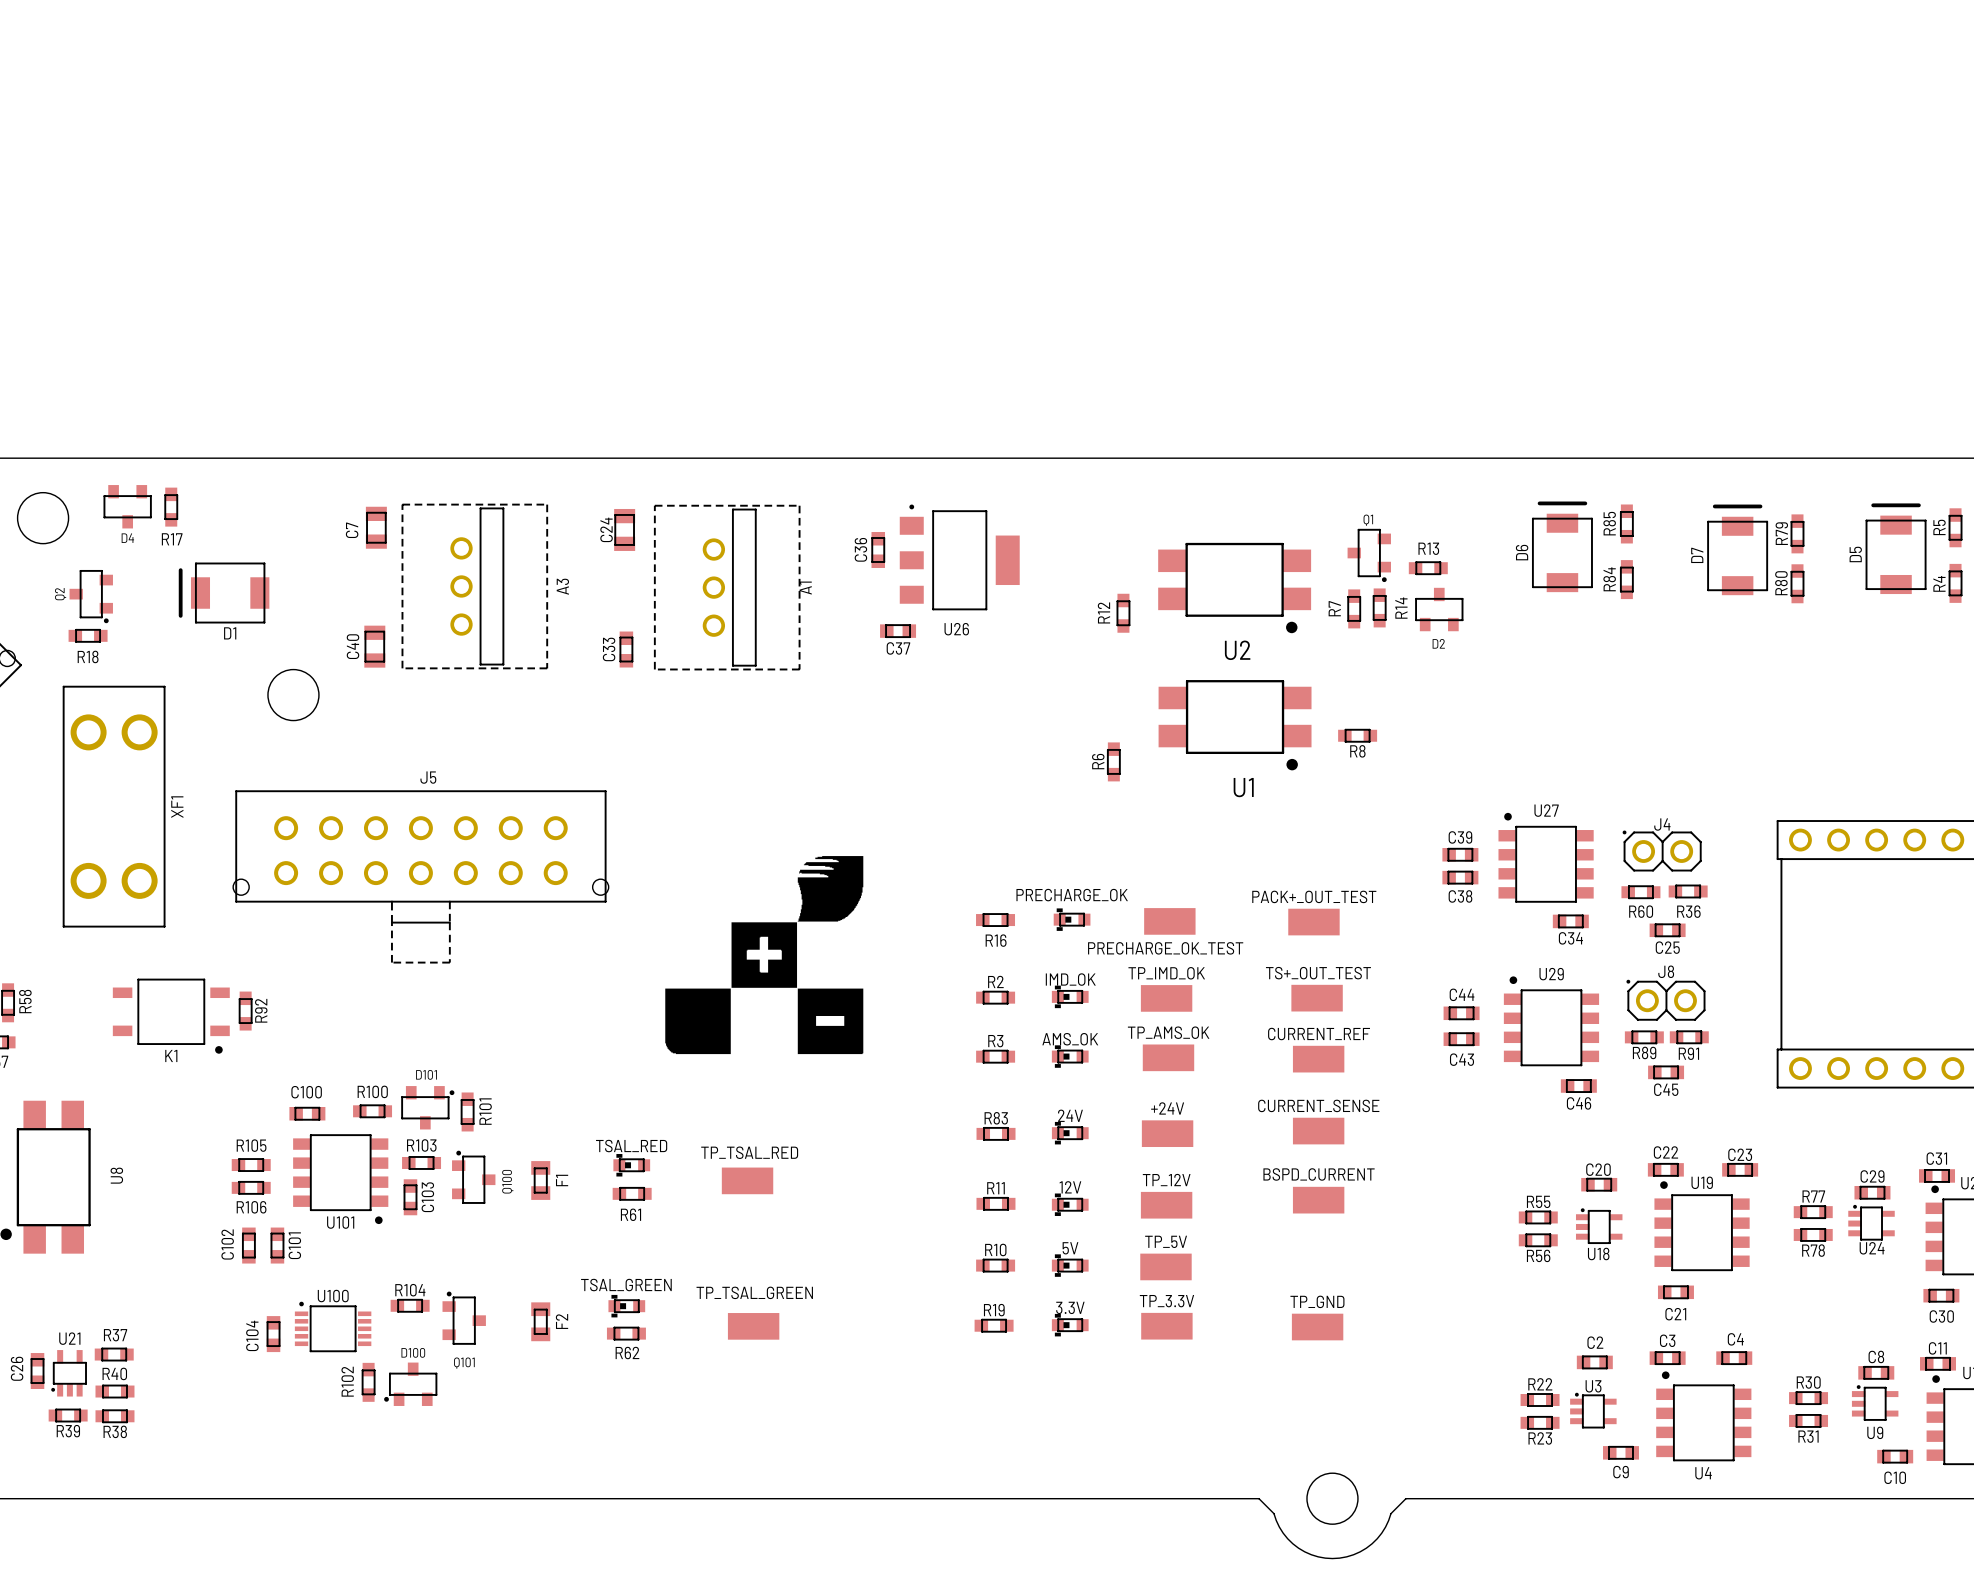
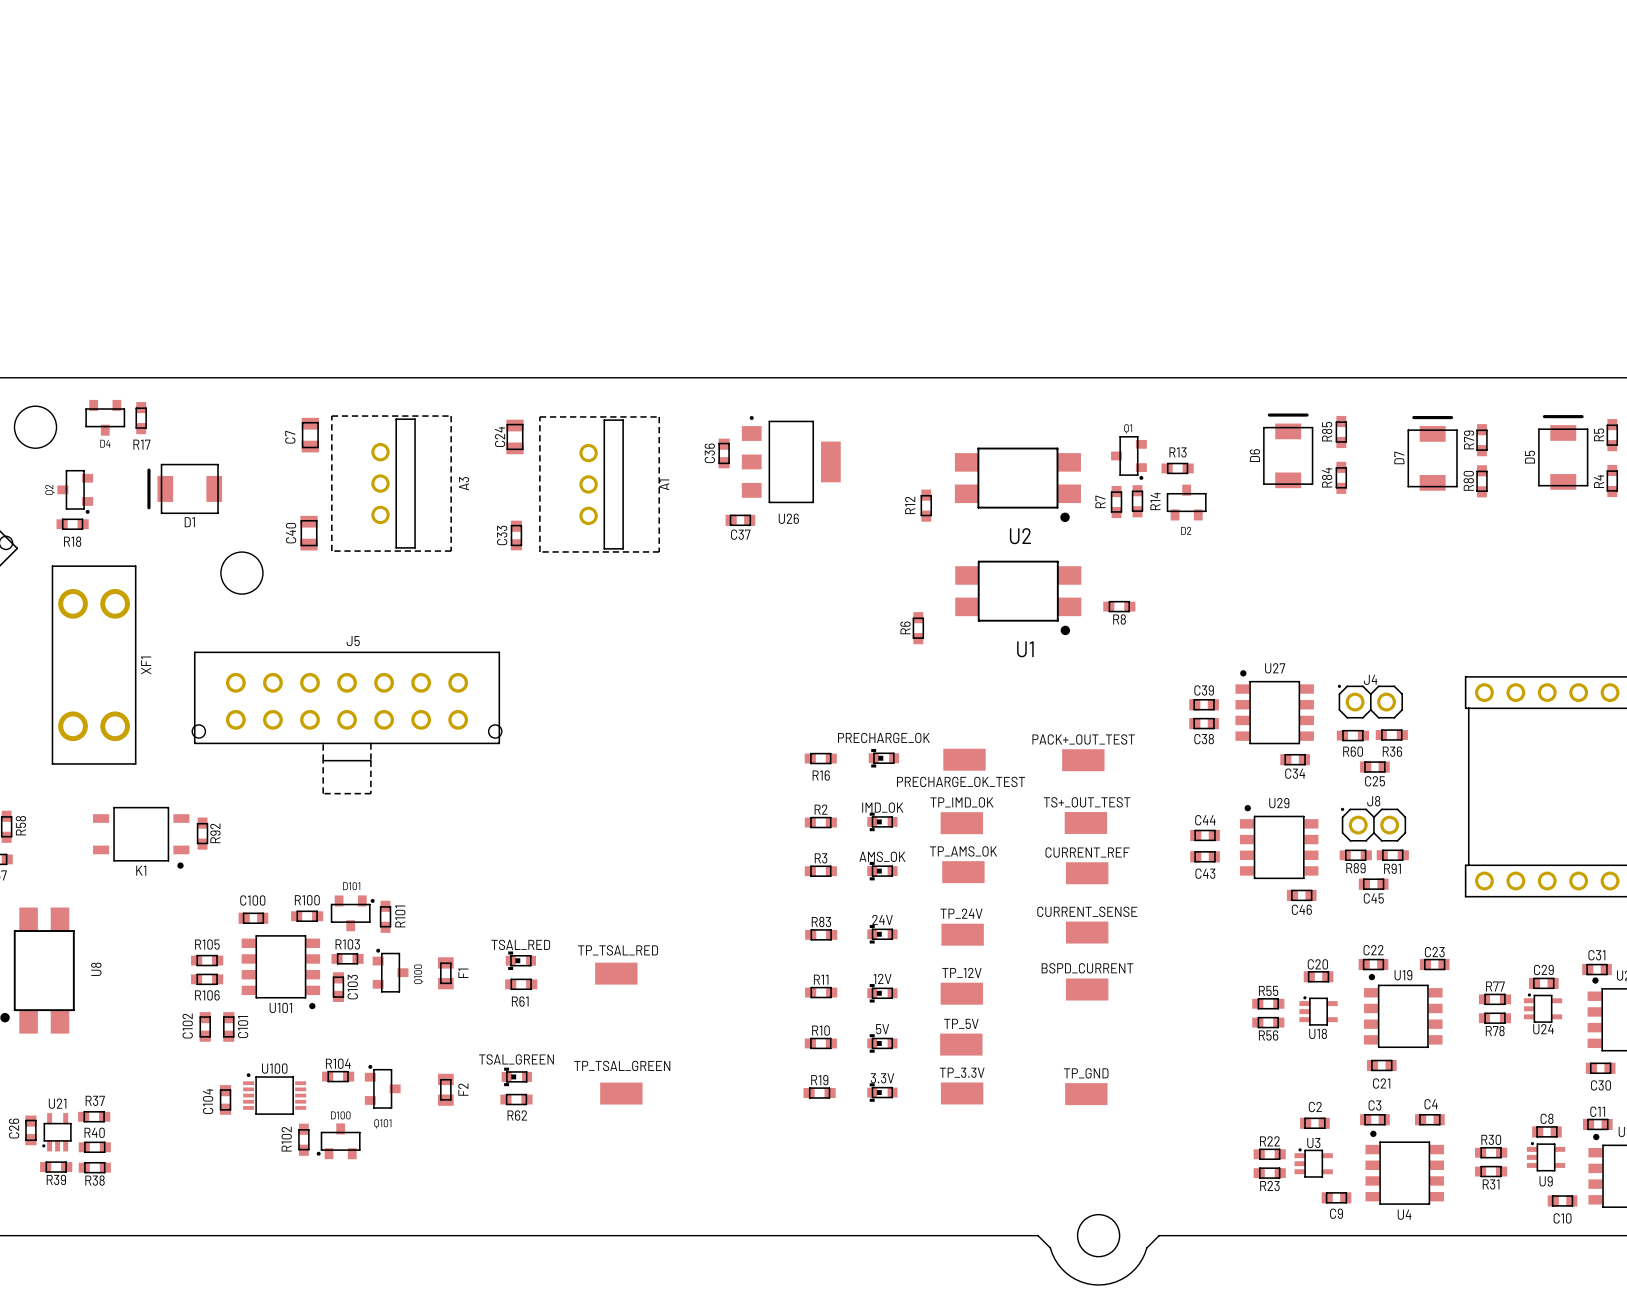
drawing: [665, 856, 864, 1055] -> none
TP_24V name: none -> TP_24V (961, 913)
TP_24V text: +24V (1167, 1108) -> none

